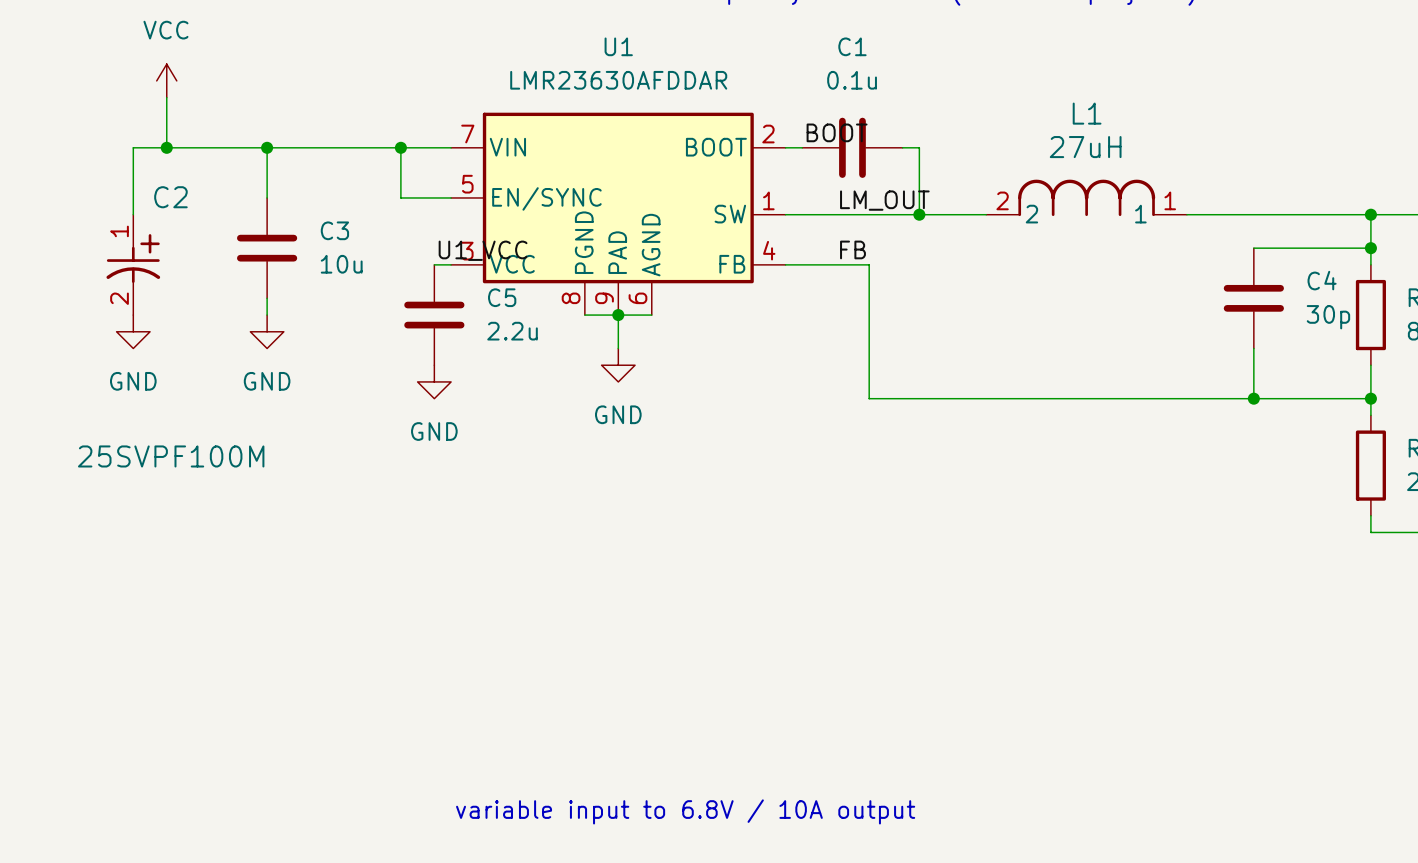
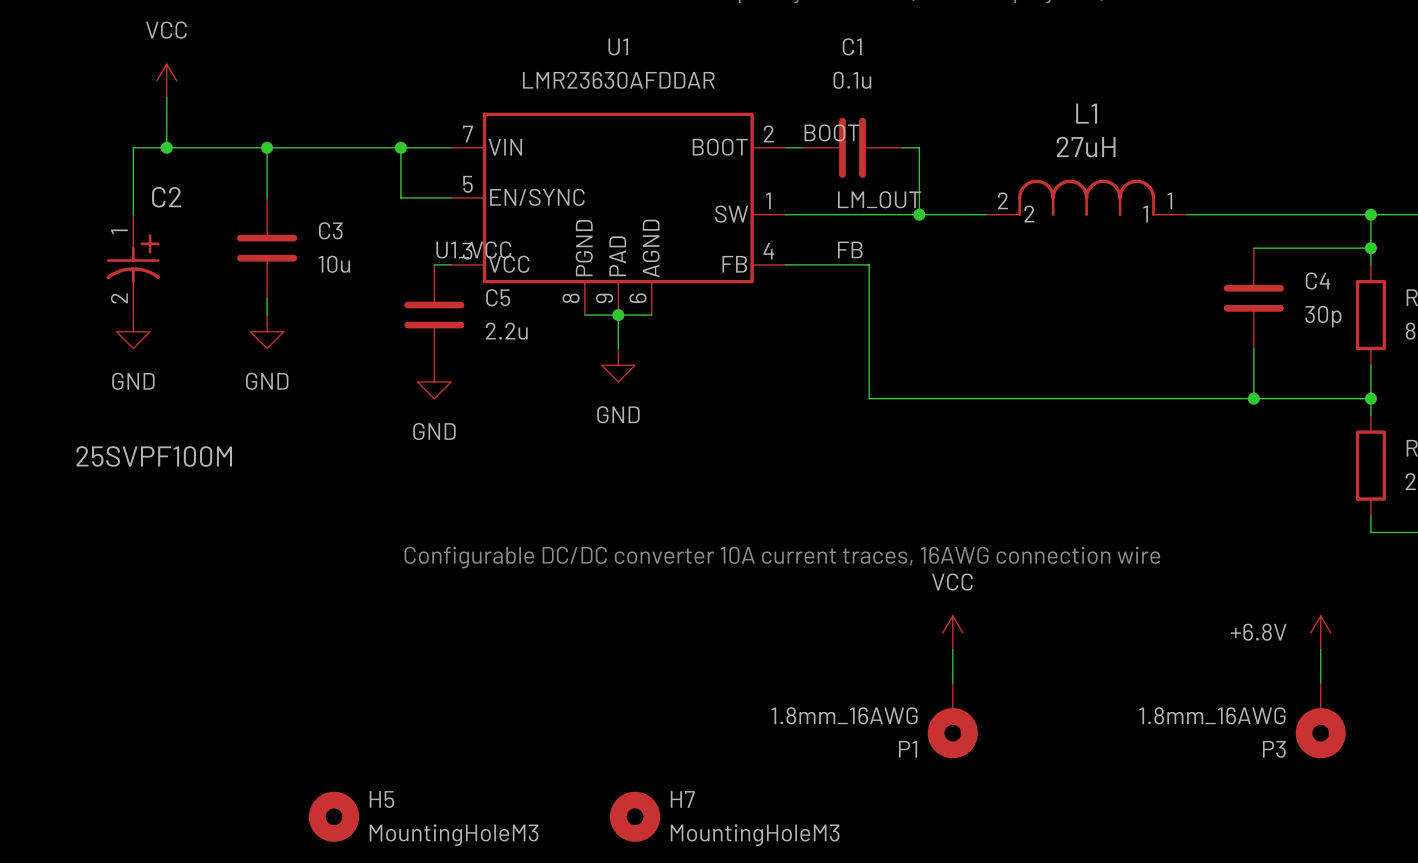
text: none -> Configurable DC/DC converter 10A current traces, 16AWG connection wire (782, 557)
power symbol: none -> VCC (952, 632)
power symbol: none -> +6.8V (1320, 632)
wire: none -> (952, 649) (952, 682)
wire: none -> (1320, 649) (1320, 682)
P1: none -> 1.8mm_16AWG (952, 720)
P3: none -> 1.8mm_16AWG (1320, 720)
text: variable input to 6.8V / 10A output (685, 811) -> none
H5: none -> MountingHoleM3 (334, 816)
H7: none -> MountingHoleM3 (635, 816)

